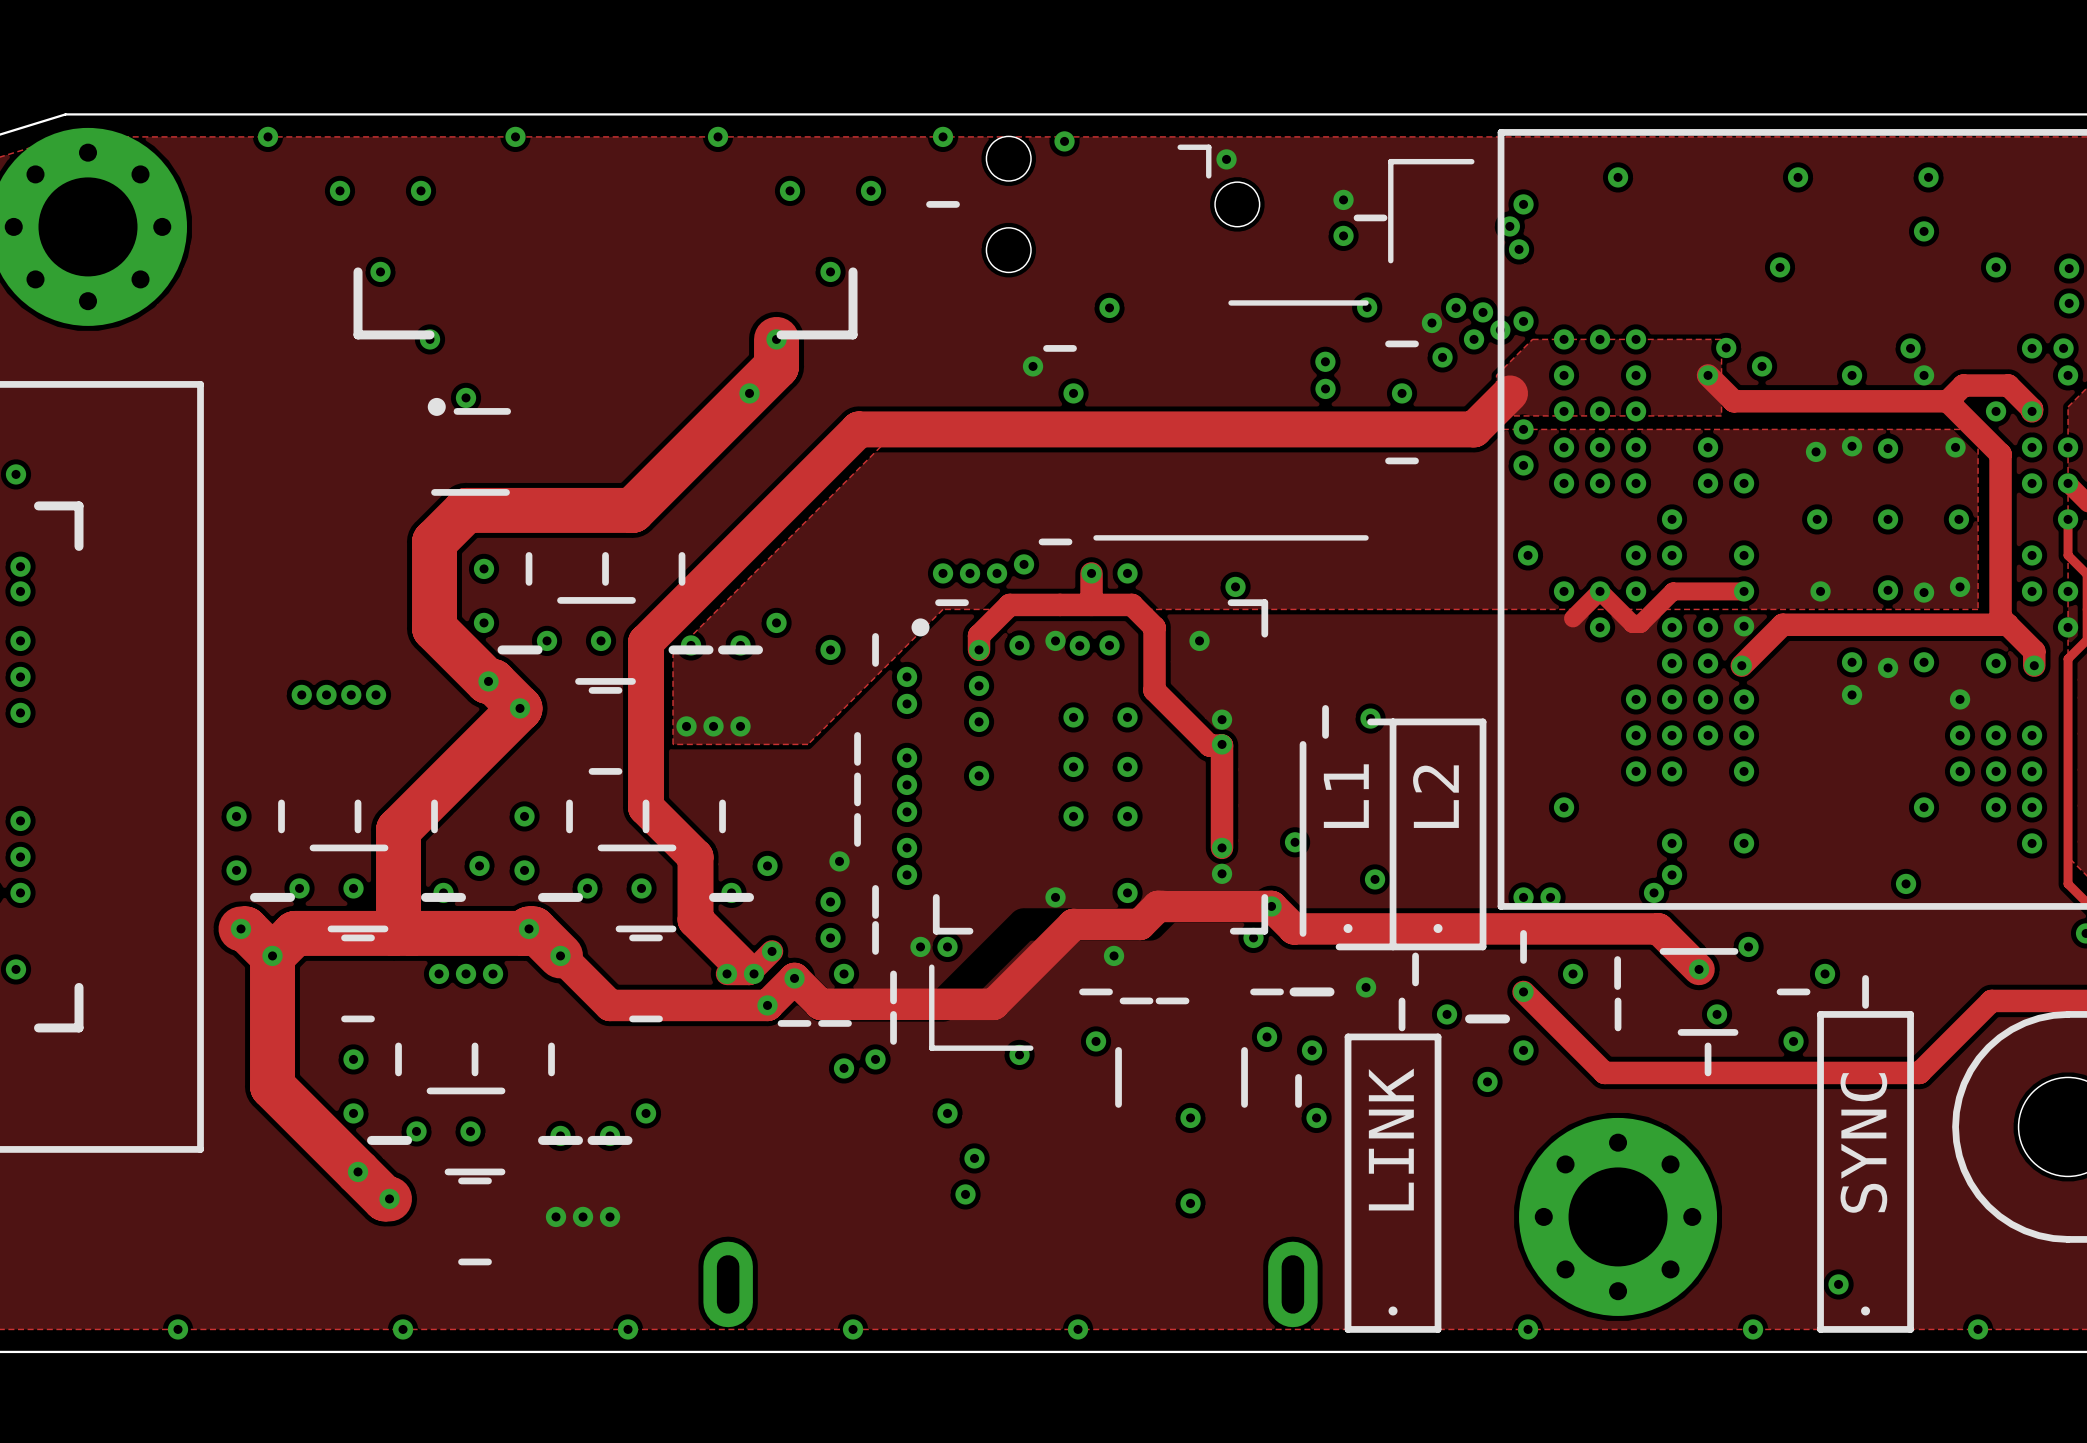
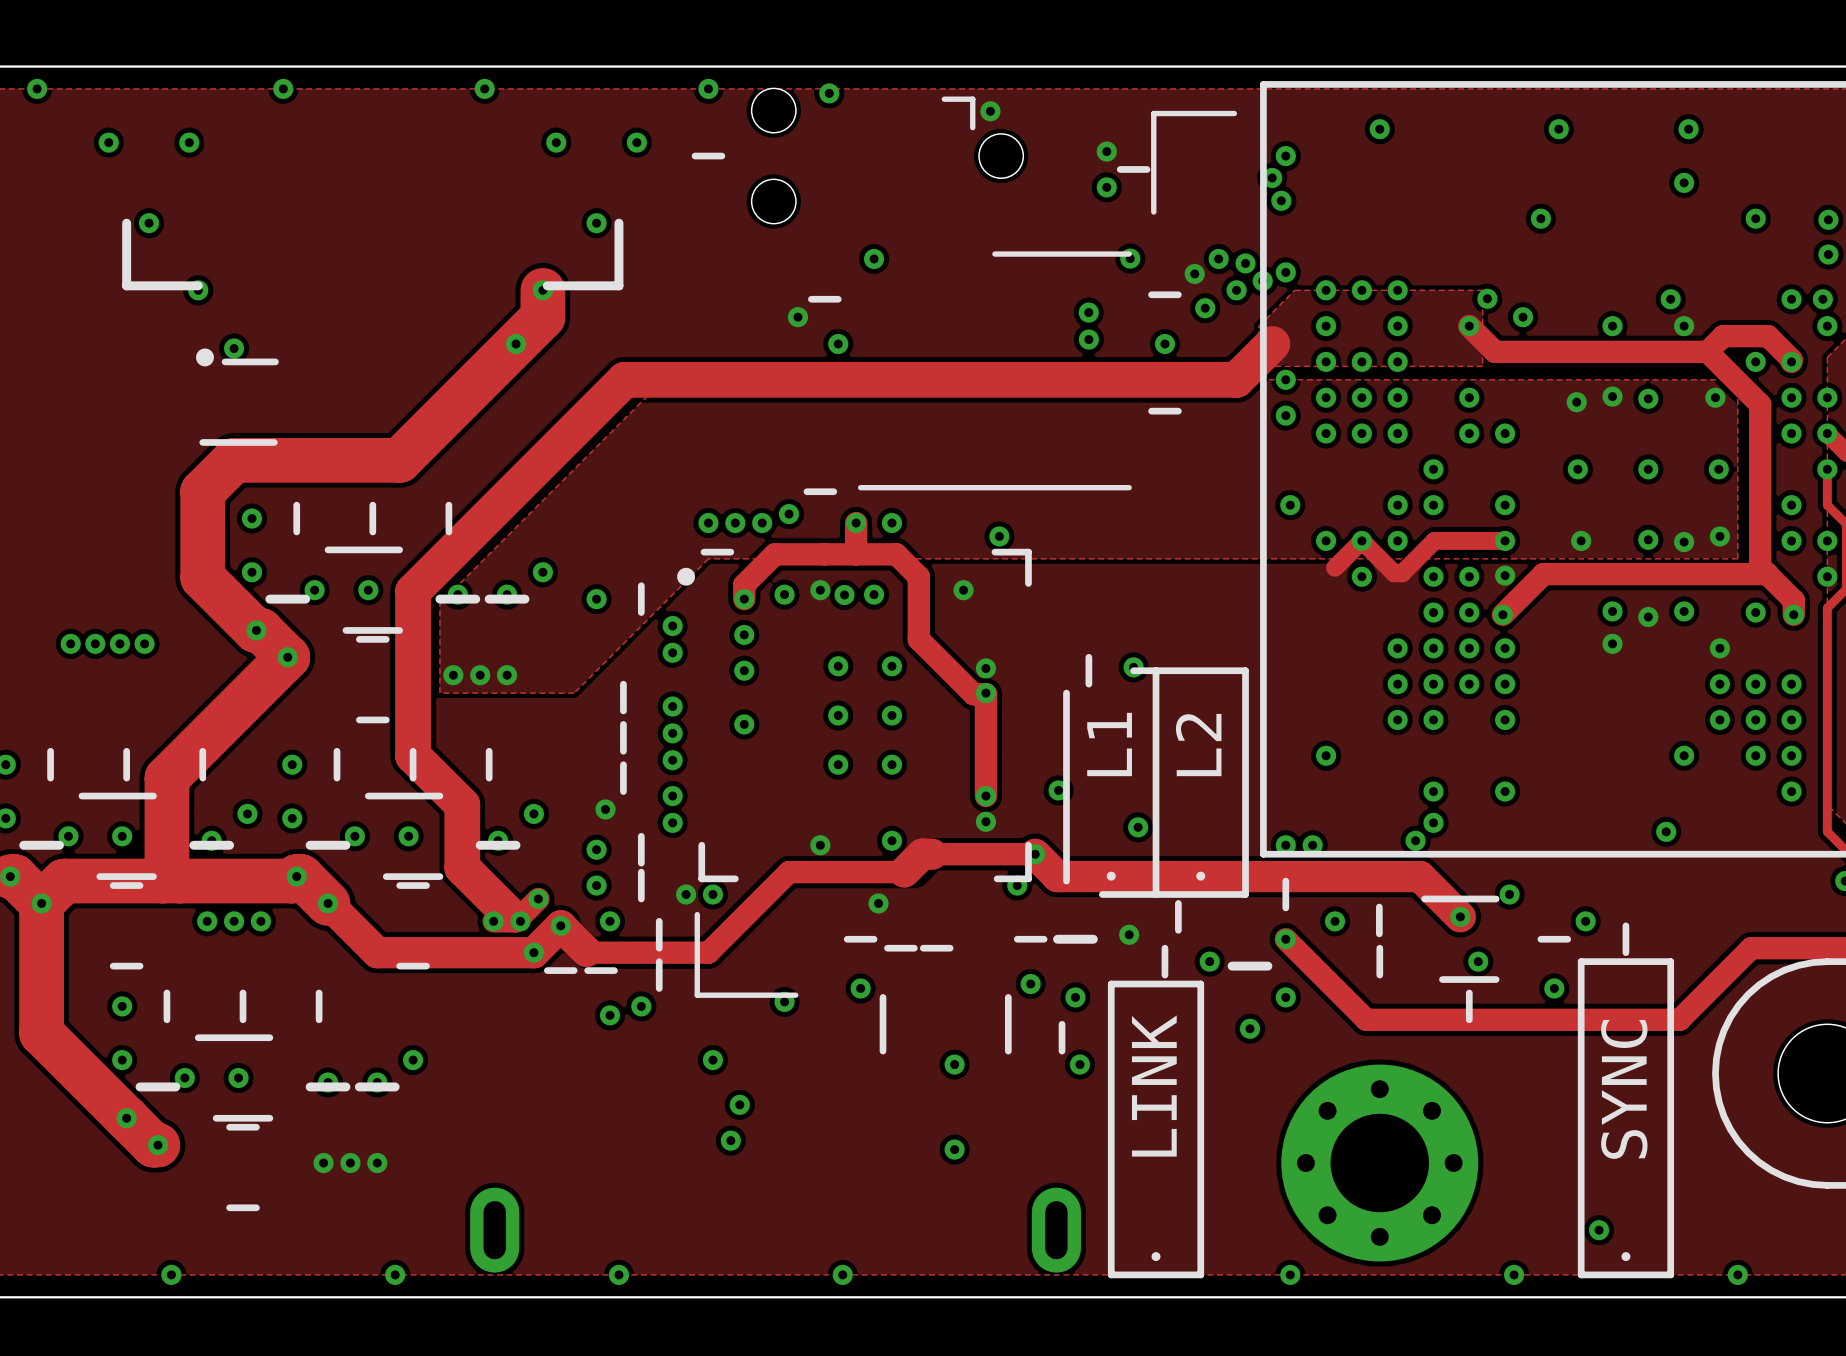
track width: thick (1168, 906) (1271, 906) -> thin (932, 854) (1035, 854)
track: (1073, 924) (993, 1004) (820, 1004) -> (838, 872) (789, 872) (708, 952) (586, 951)
track width: thick (1073, 924) (1139, 924) -> thin (838, 872) (904, 872)

